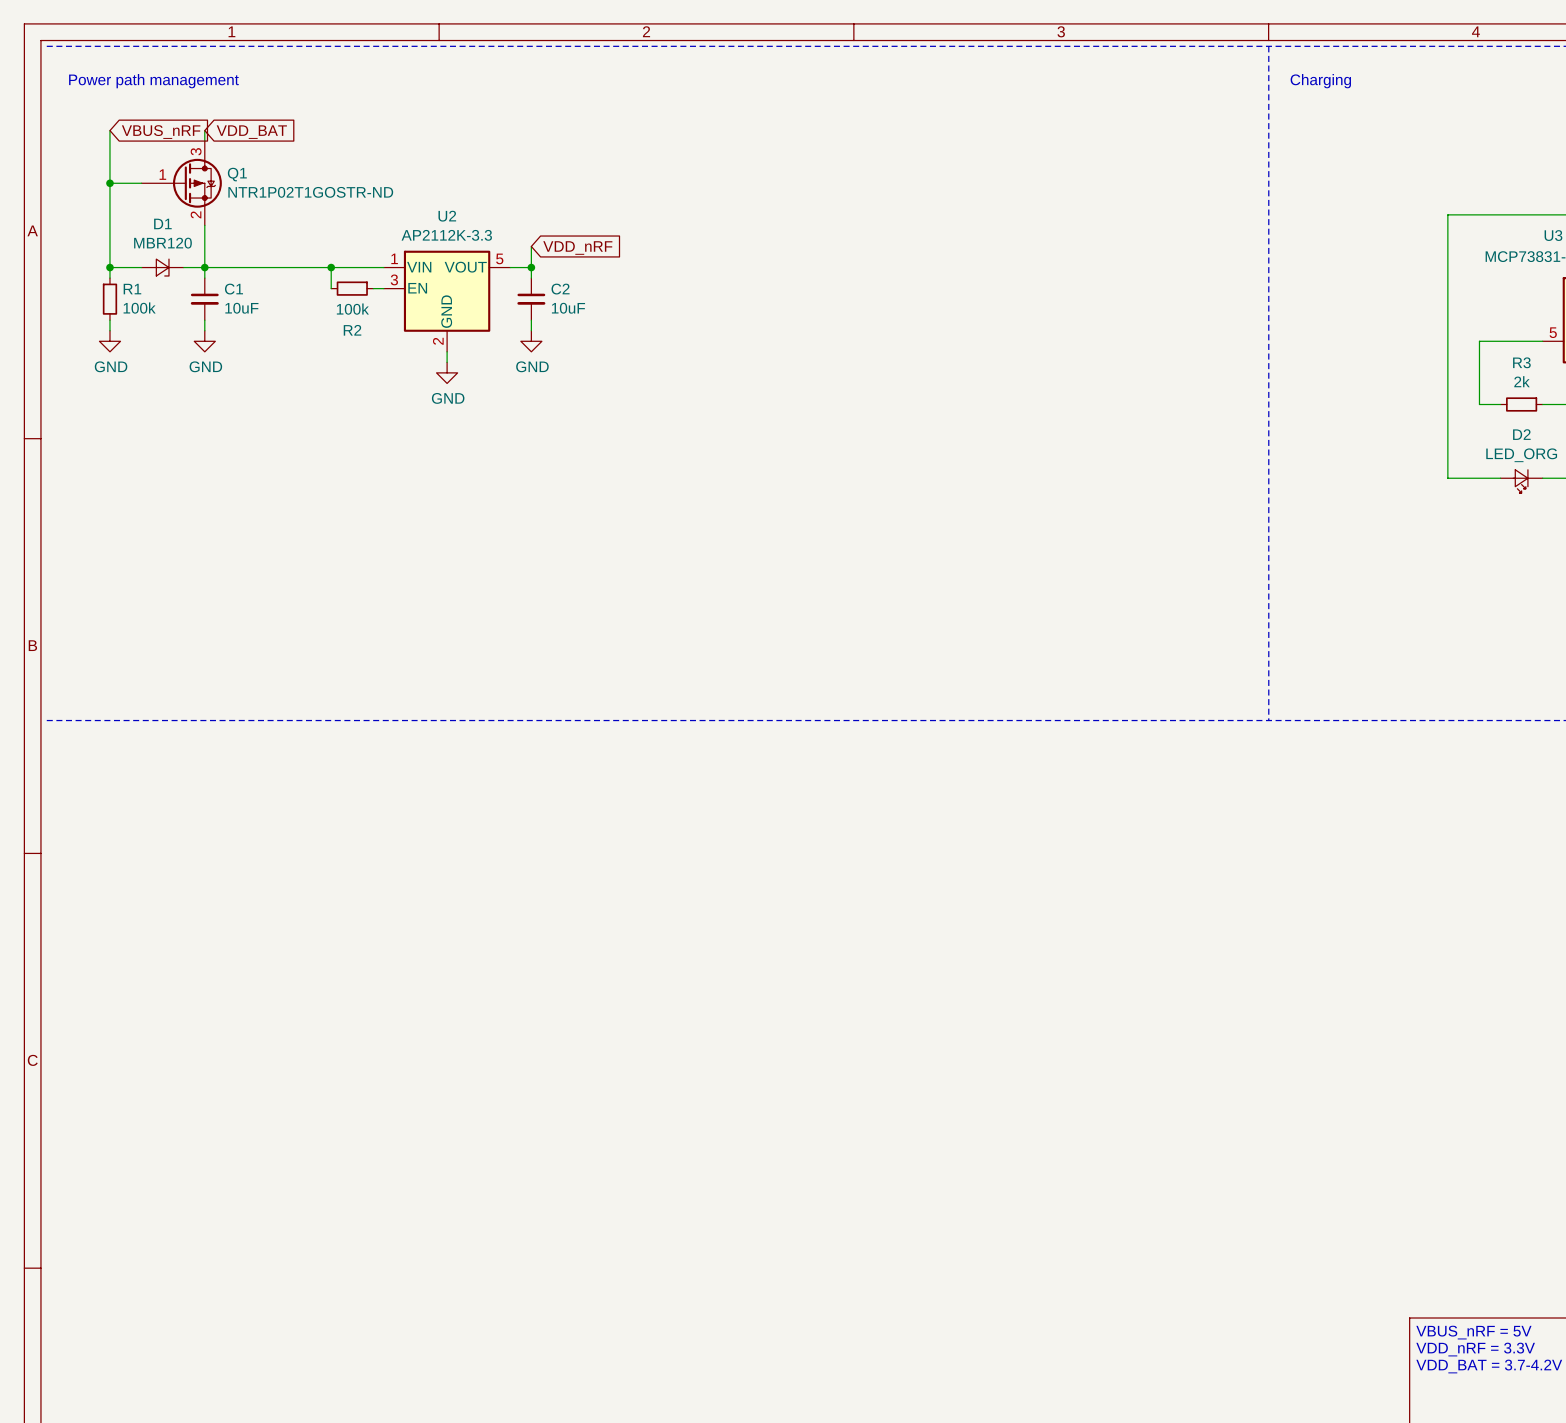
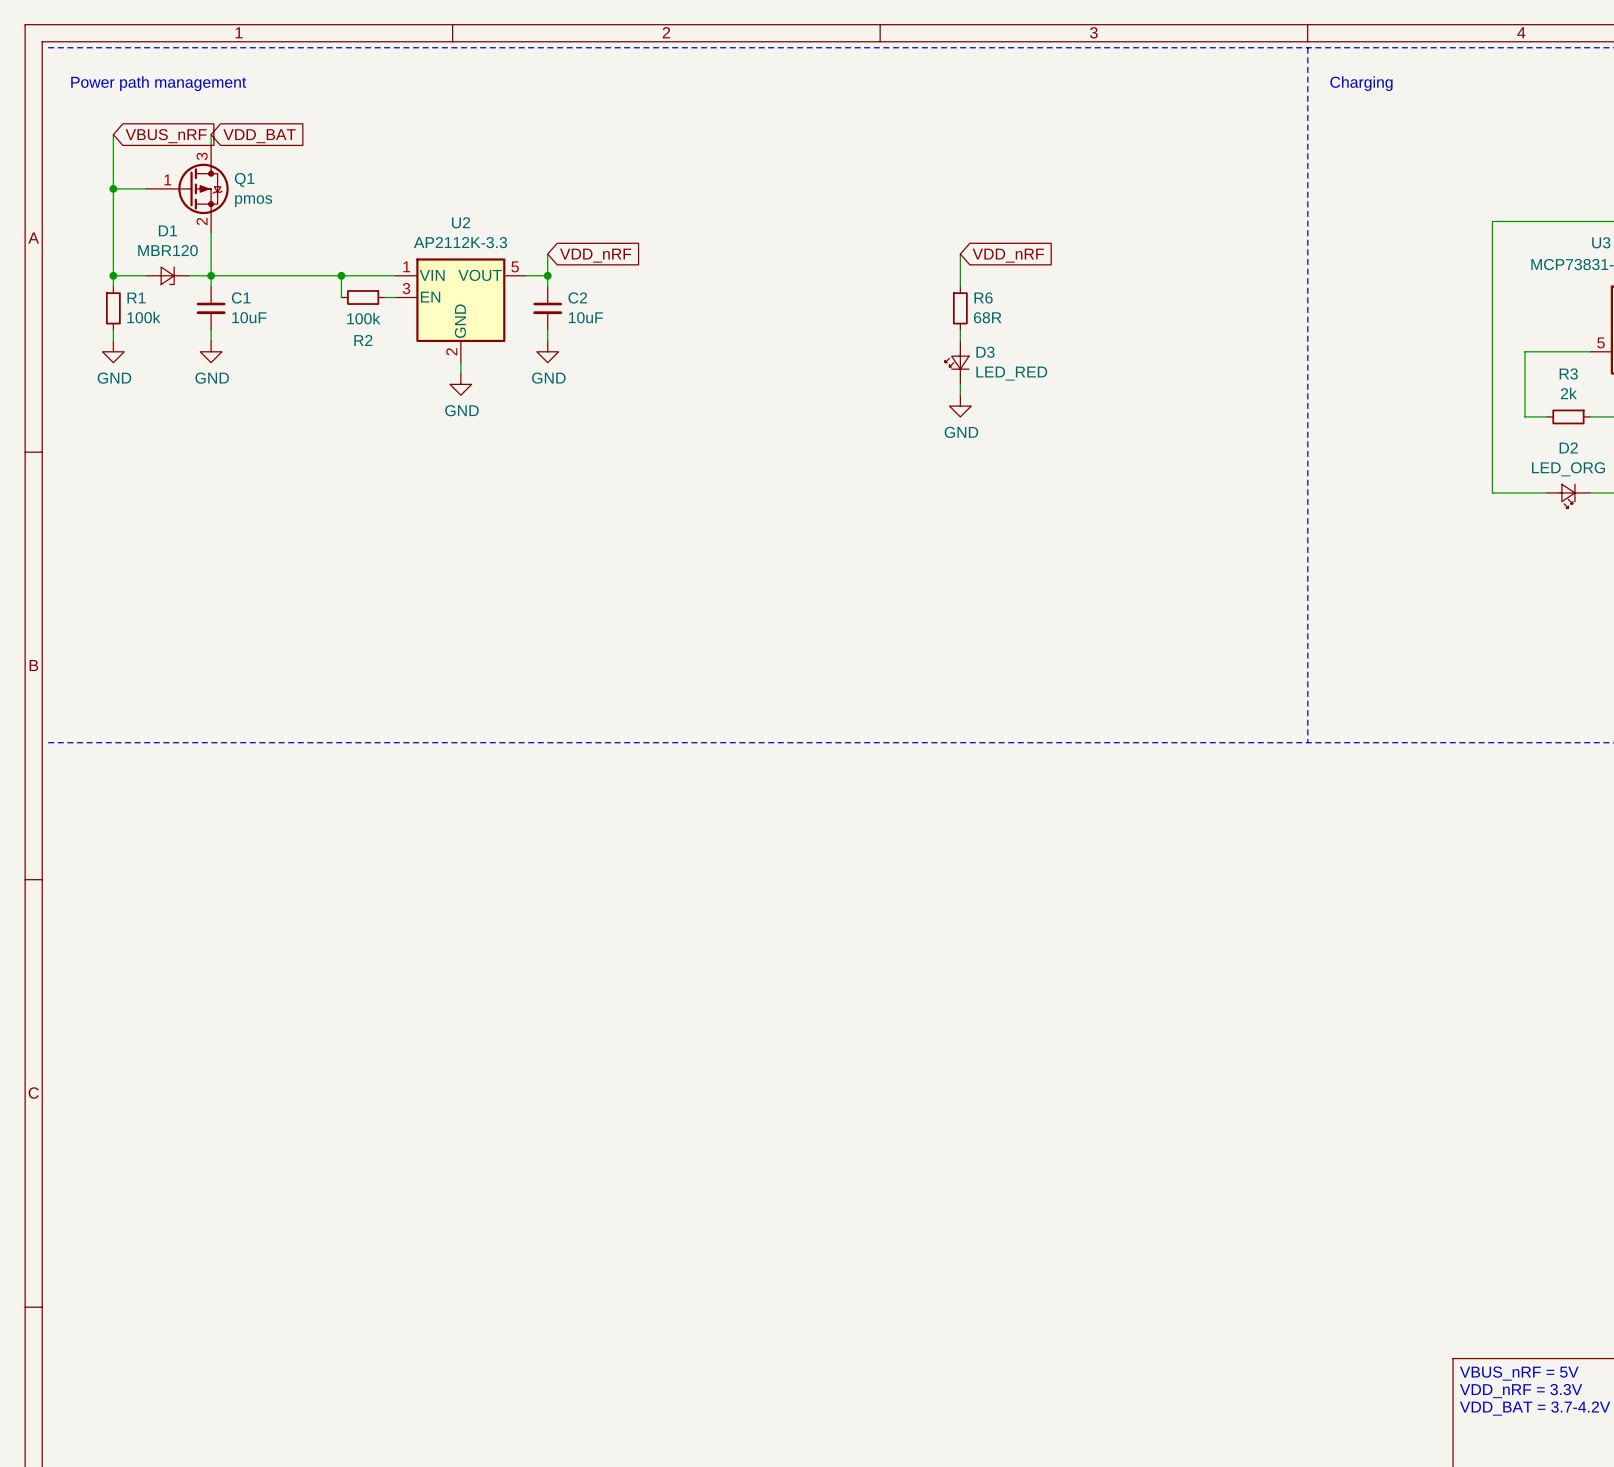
Q1 value: NTR1P02T1GOSTR-ND (310, 192) -> pmos (253, 201)
wire: none -> (960, 254) (960, 286)
global label: none -> VDD_nRF (1008, 255)
R6: none -> 68R (960, 308)
wire: none -> (960, 330) (960, 340)
D3: none -> LED_RED (957, 362)
wire: none -> (960, 384) (960, 395)
power symbol: none -> GND (960, 406)

